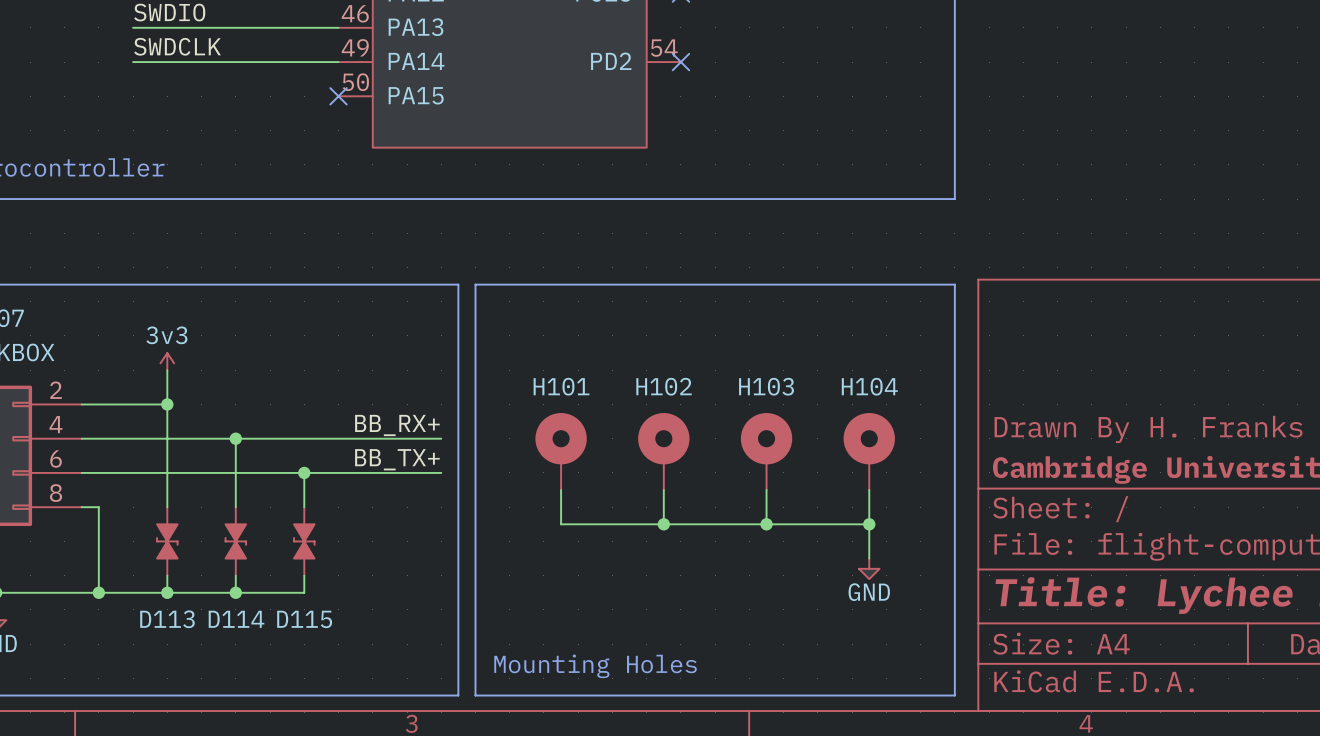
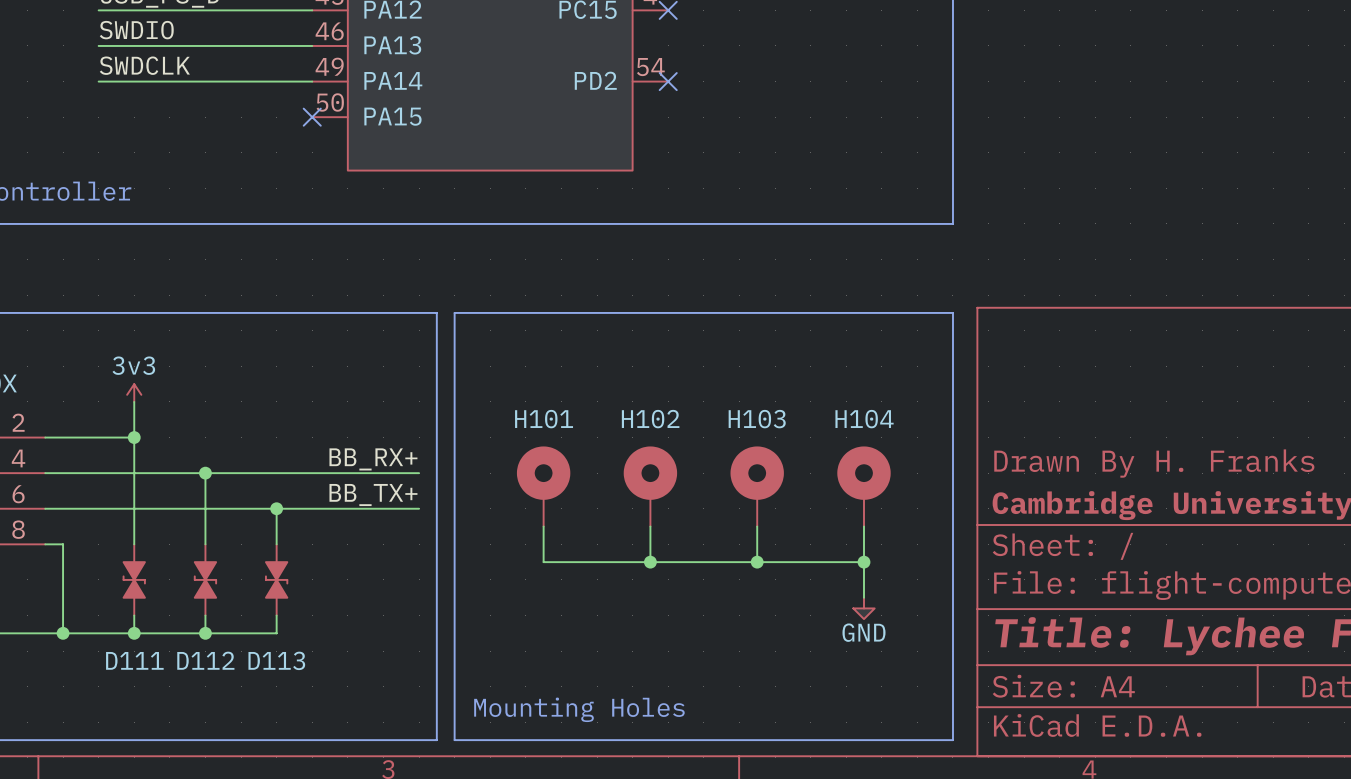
D113 name: D113 (167, 619) -> D111 (134, 660)
D114 name: D114 (236, 619) -> D112 (205, 660)
D115 name: D115 (304, 619) -> D113 (276, 660)

